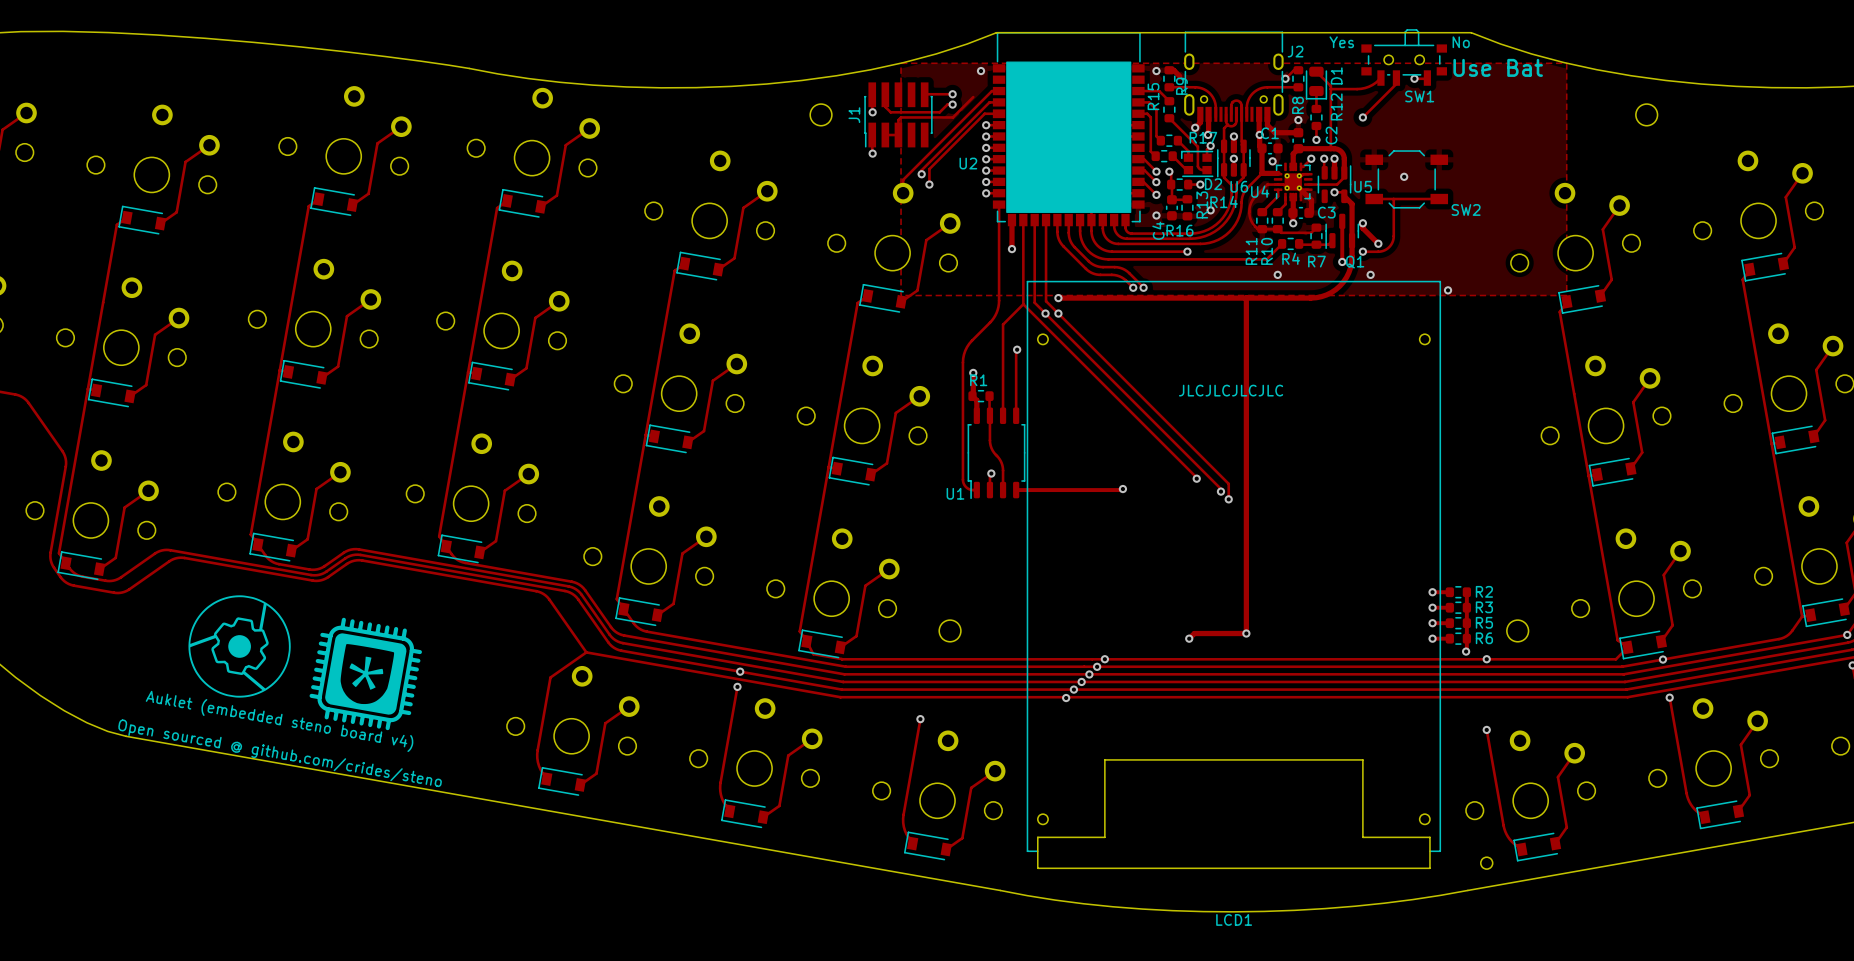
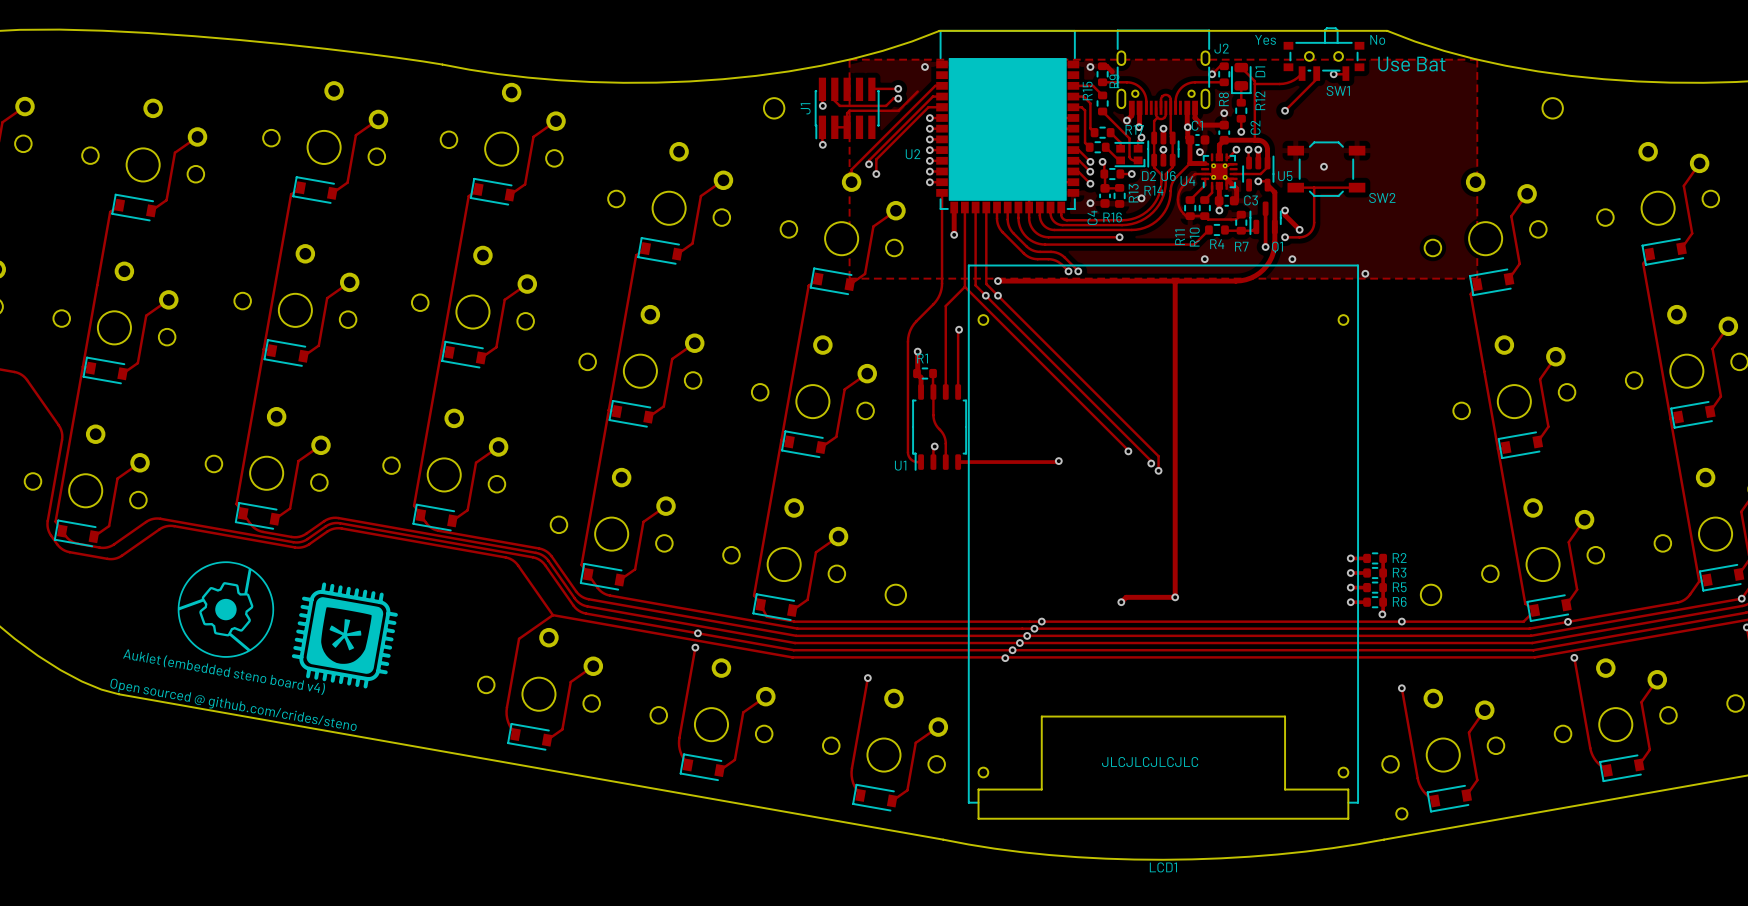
D2 rotation: 0° (1197, 163) -> 180° (1129, 154)
text: JLCJLCJLCJLC (1231, 390) -> none
text: none -> JLCJLCJLCJLC (1150, 762)

